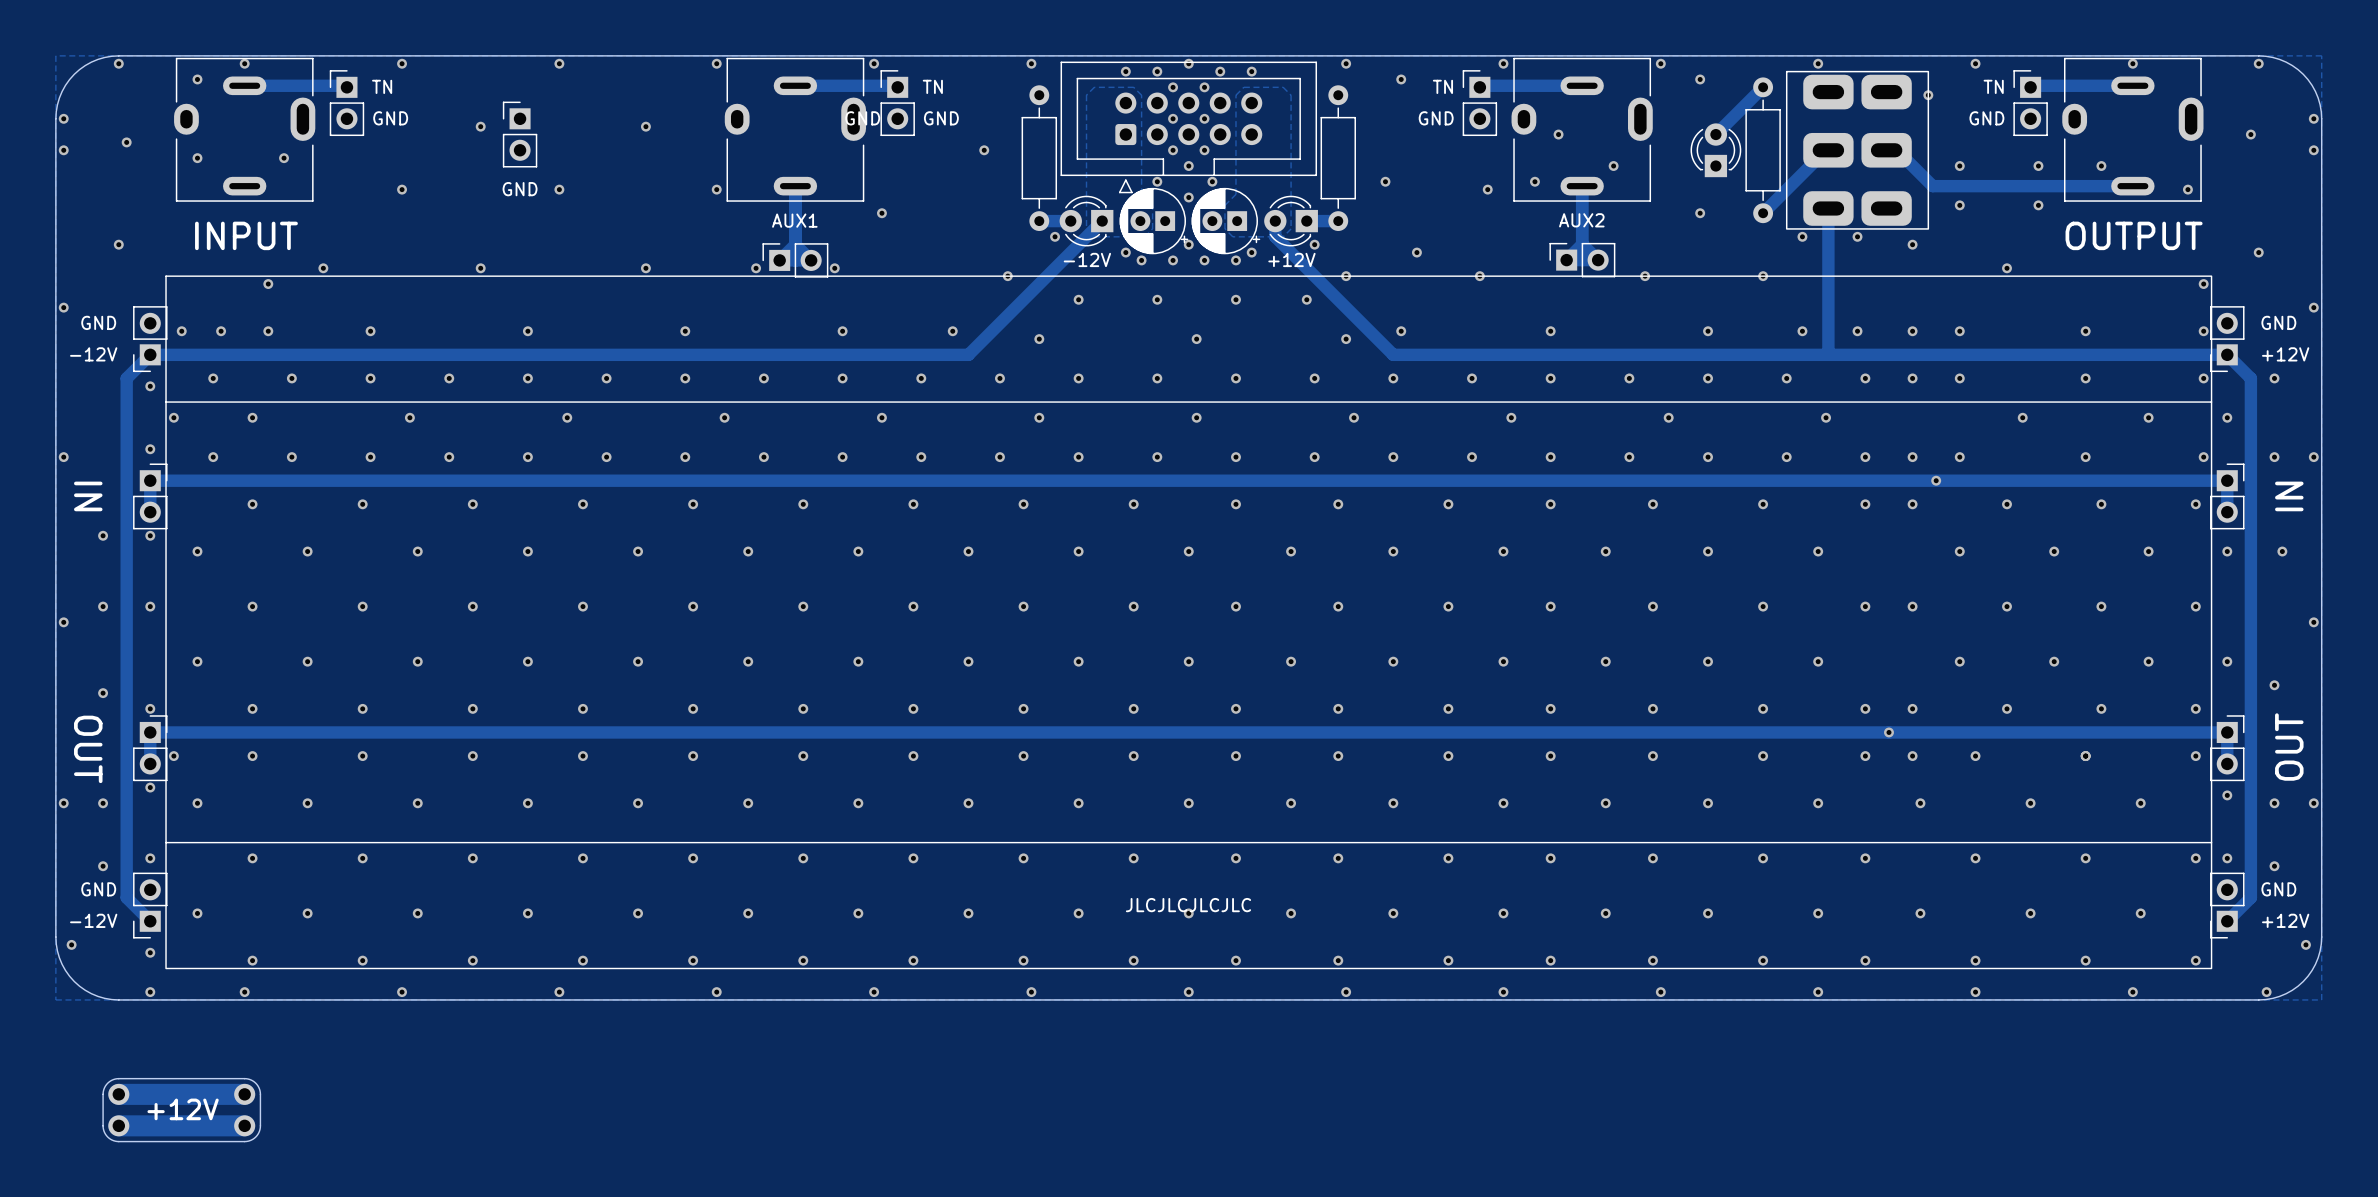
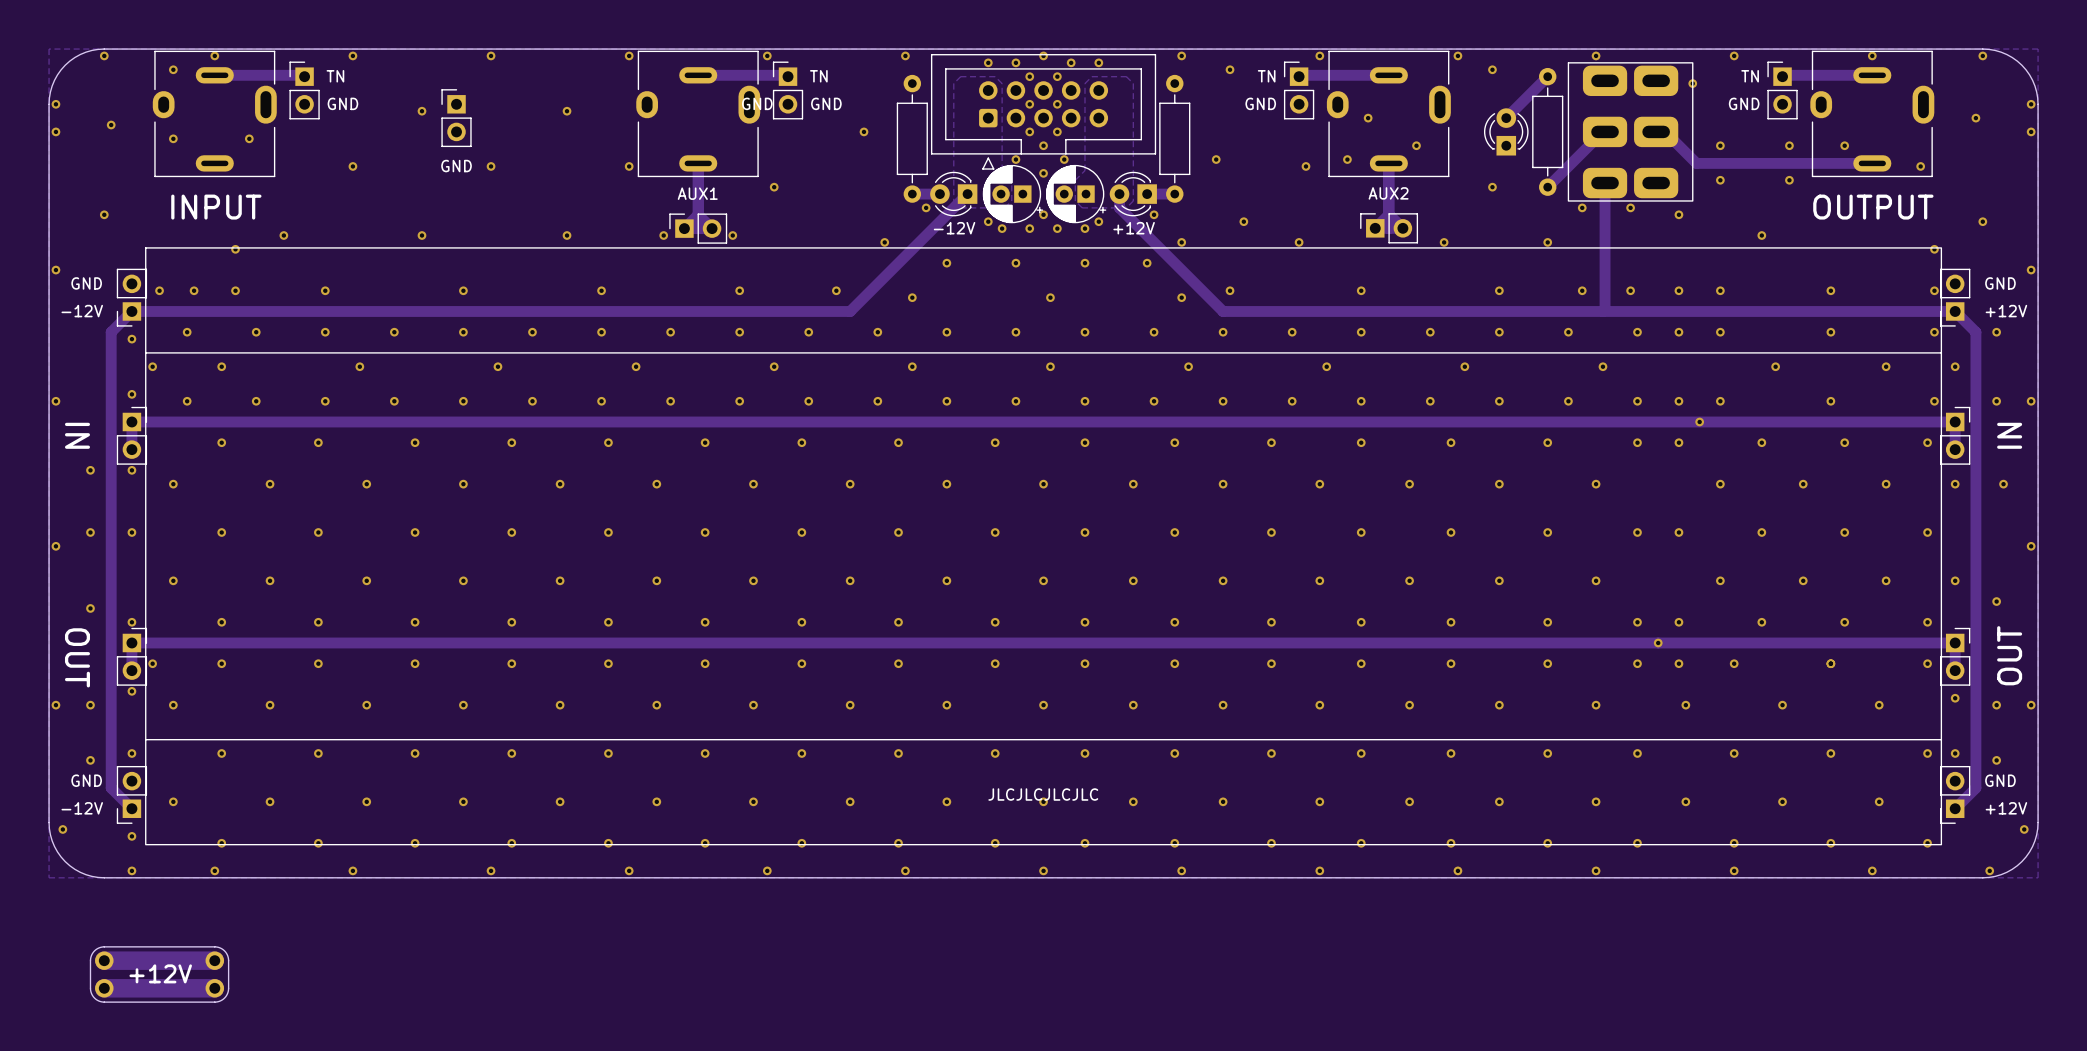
drawing shape: [165, 275, 2213, 970] -> [145, 247, 1942, 846]

